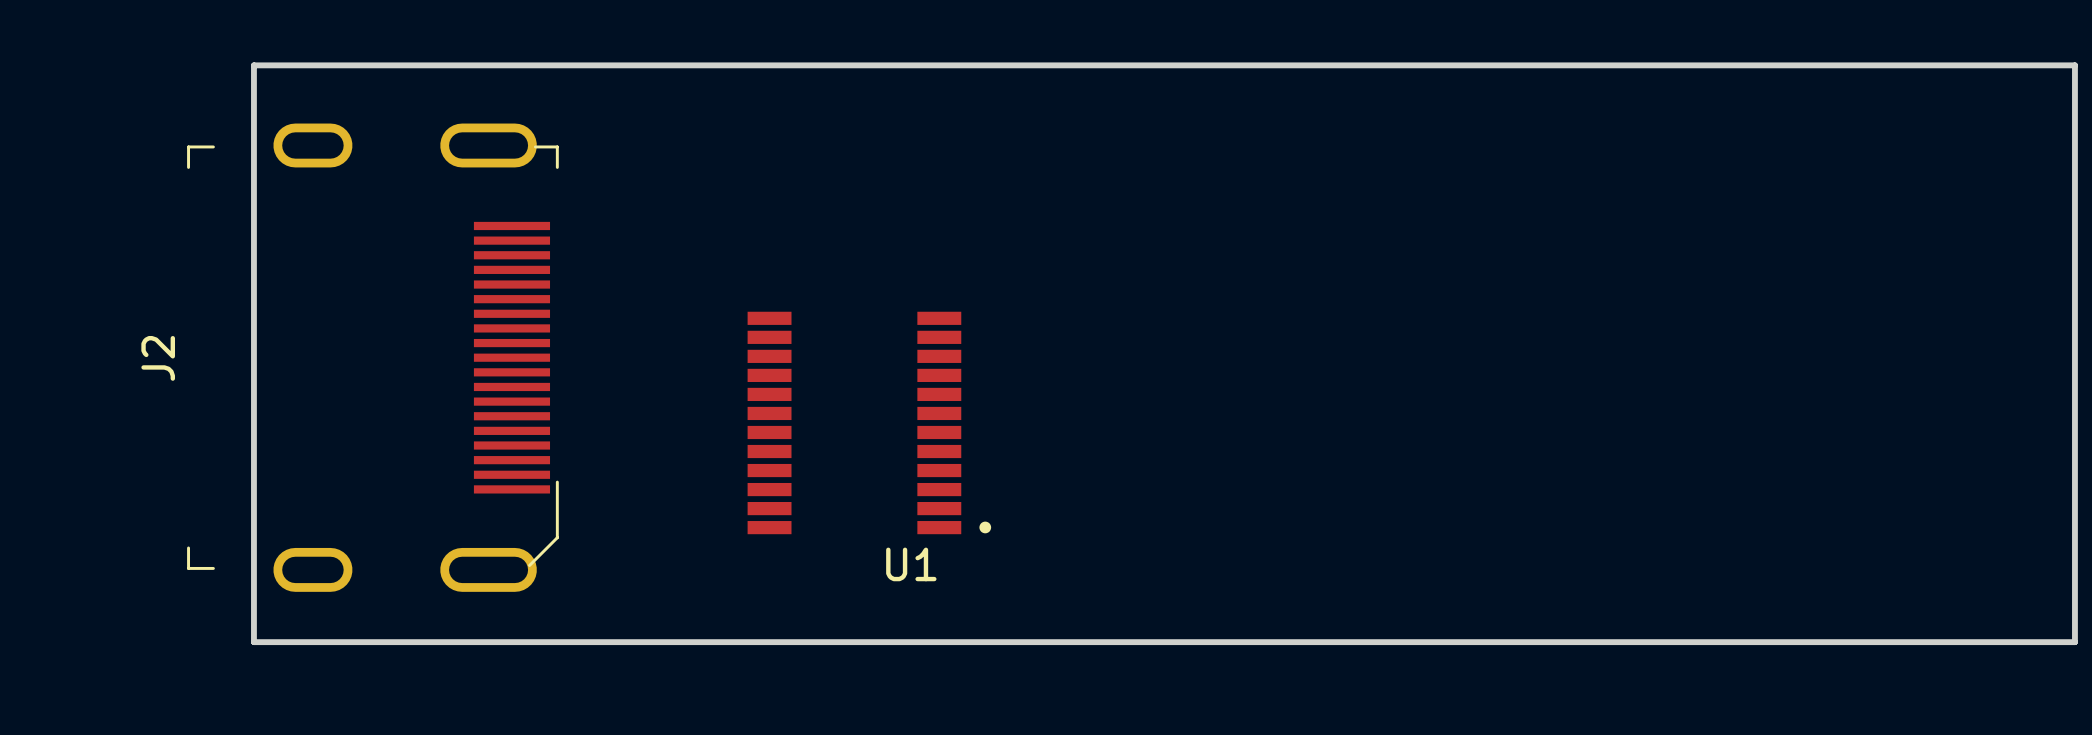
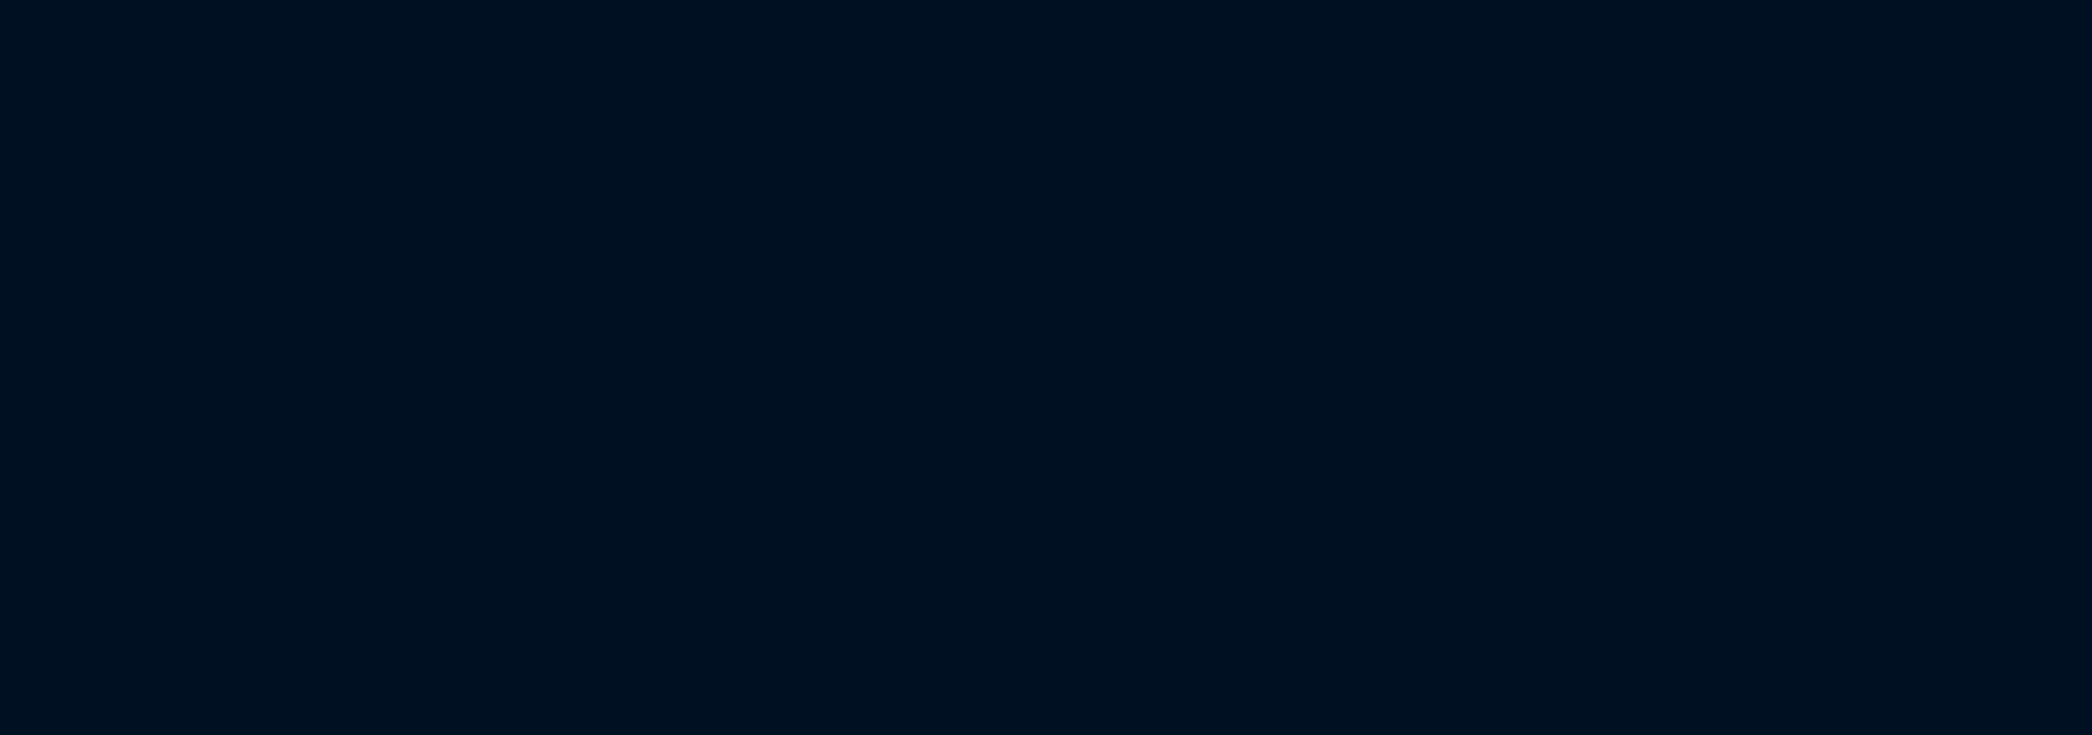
board edge: (253, 65) (2074, 65) (2074, 642) (253, 642) (253, 65) -> none
J2: (372, 357) -> none
U1: (869, 422) -> none

